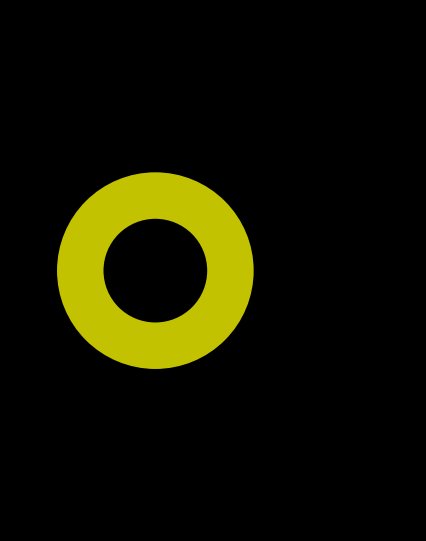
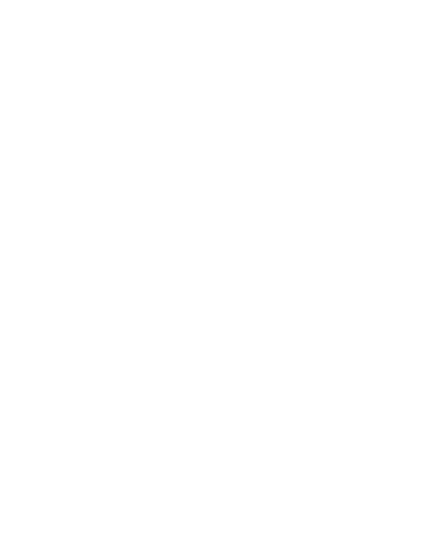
part: (155, 270) -> none

